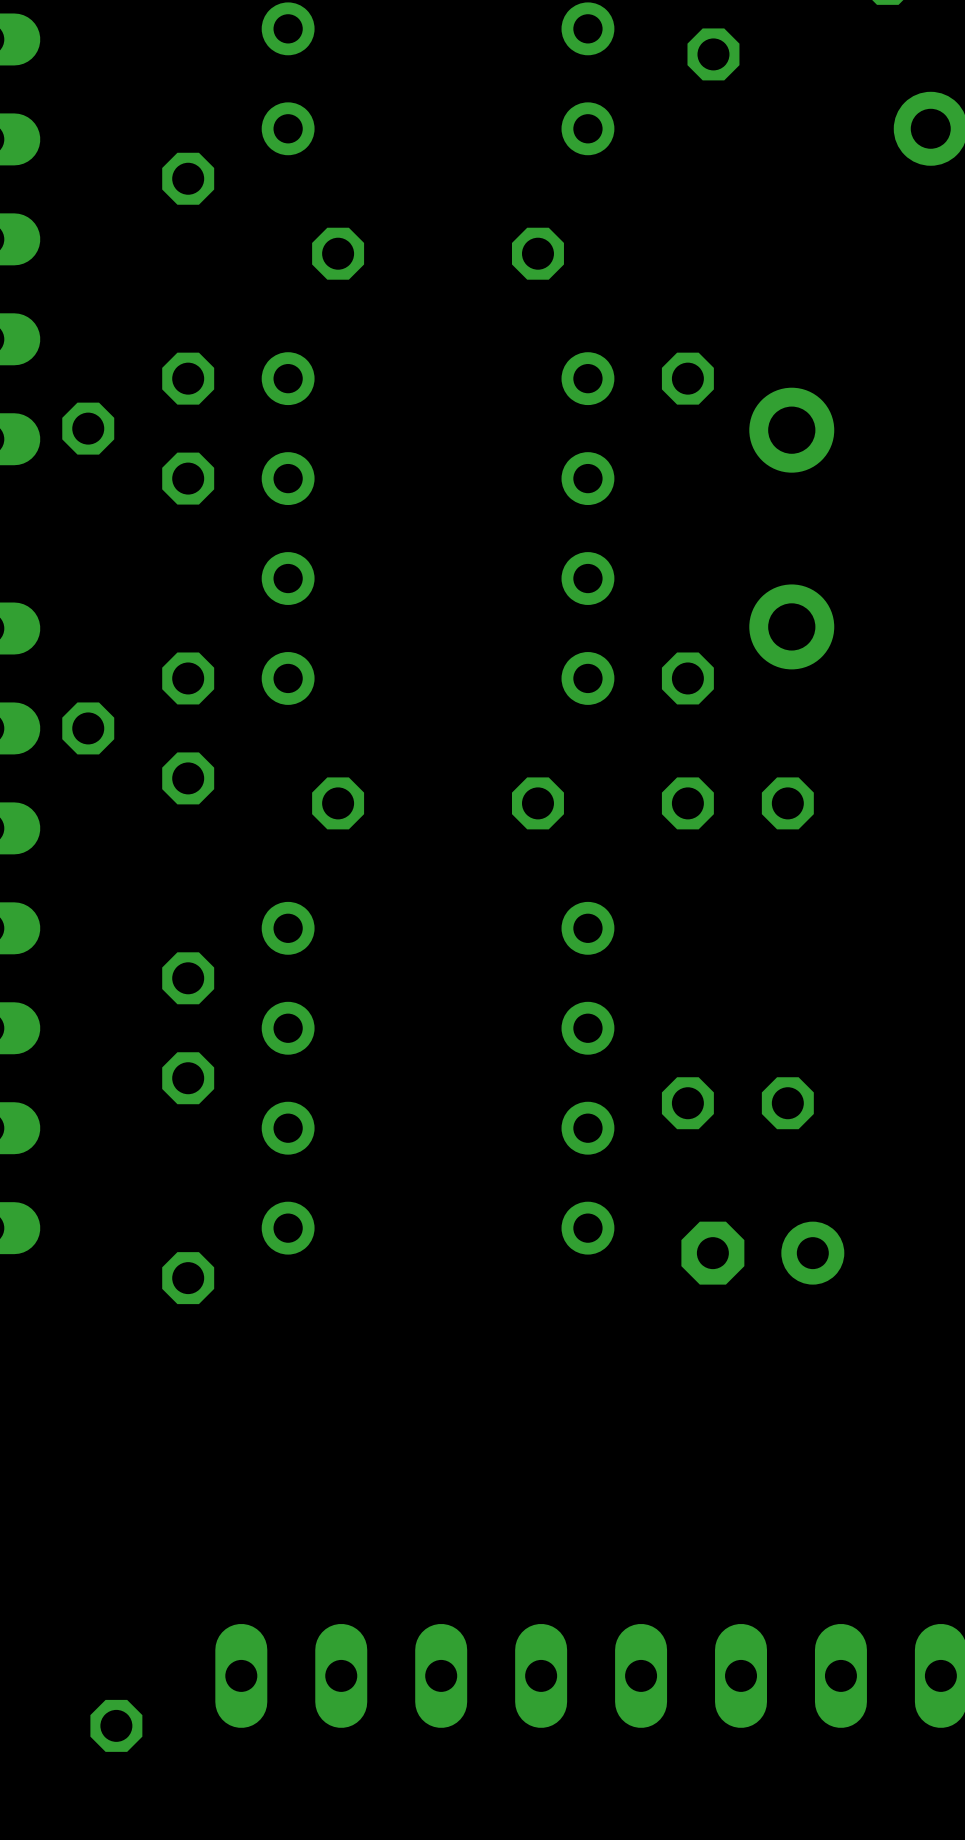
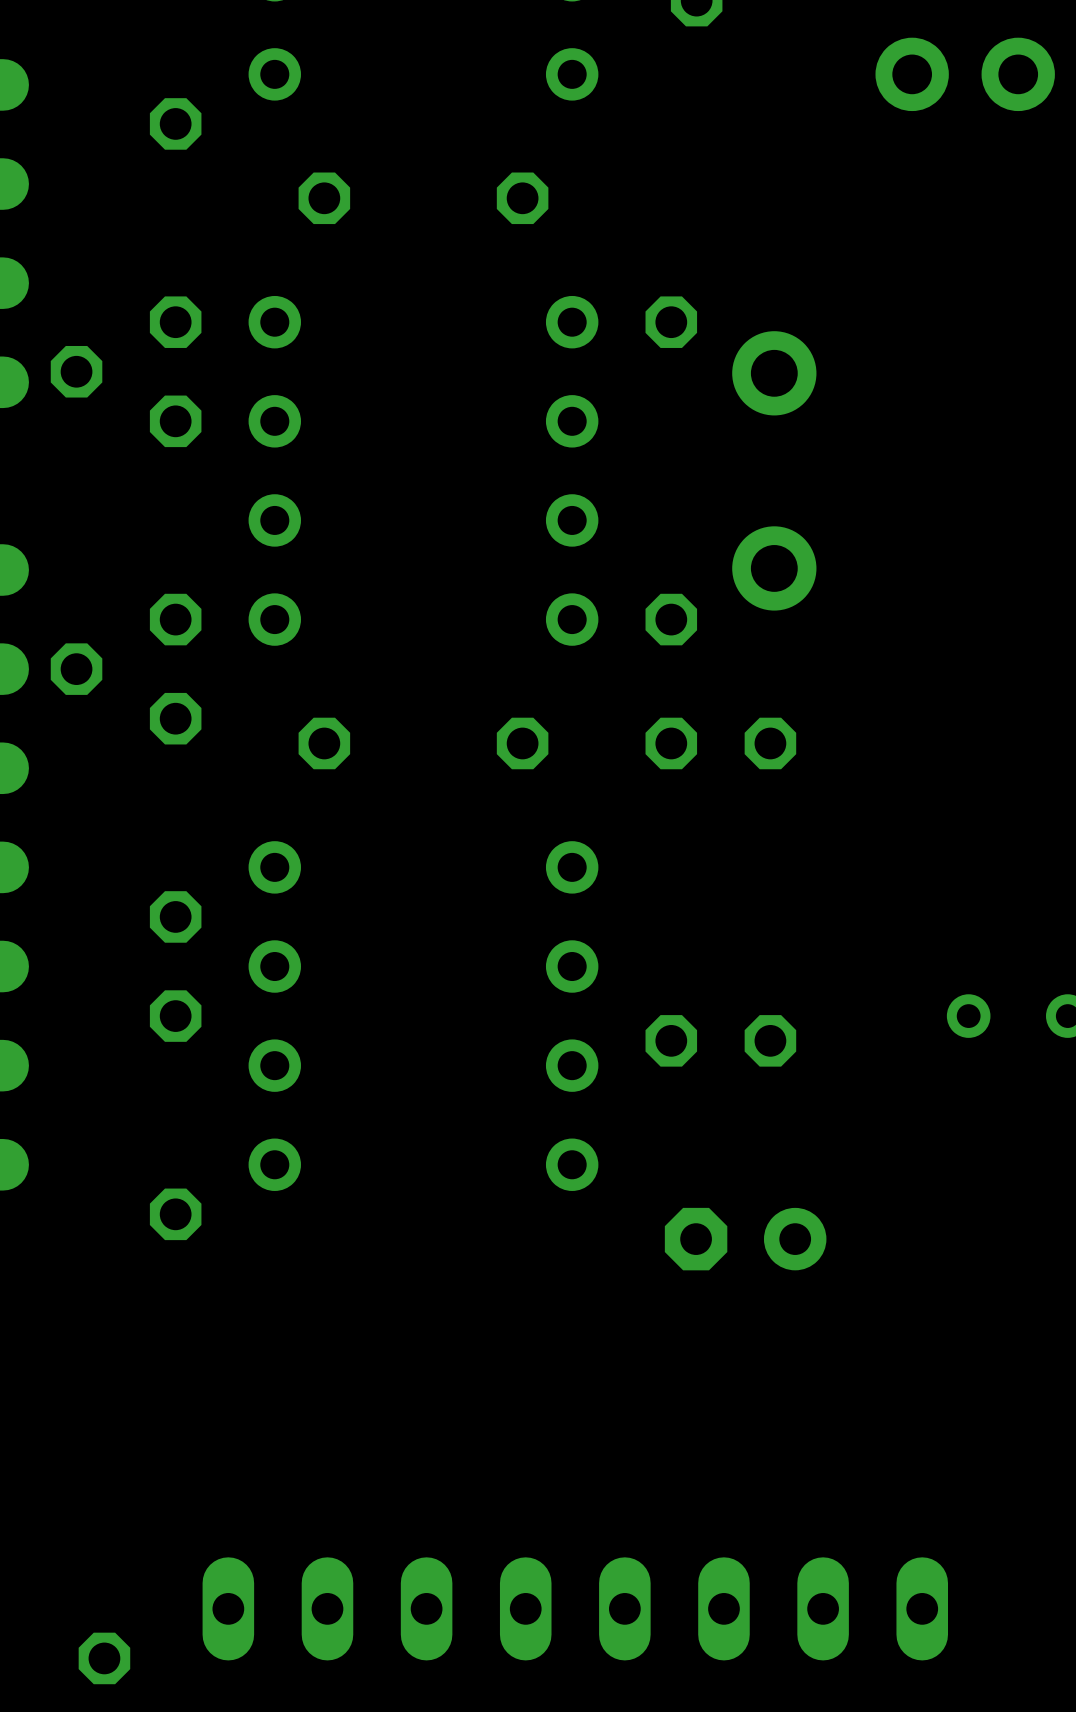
part position: (762, 1253) -> (745, 1239)

